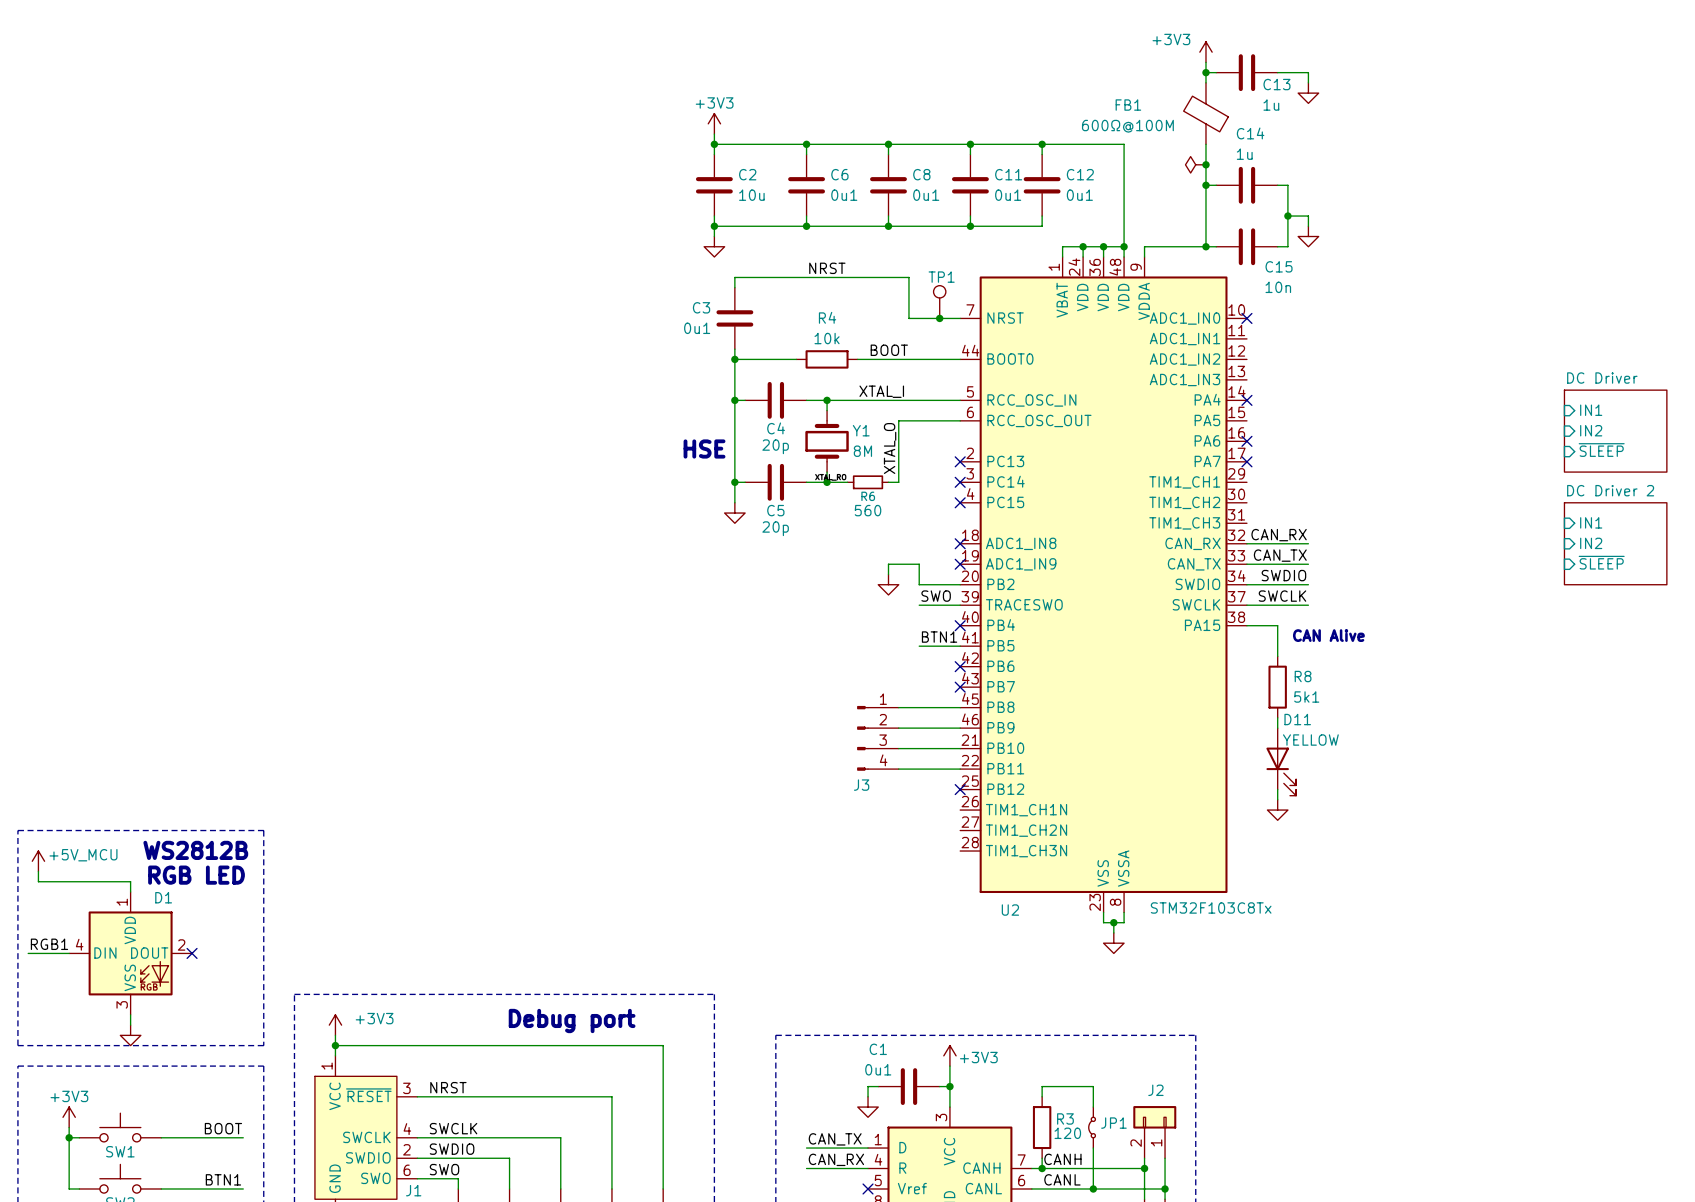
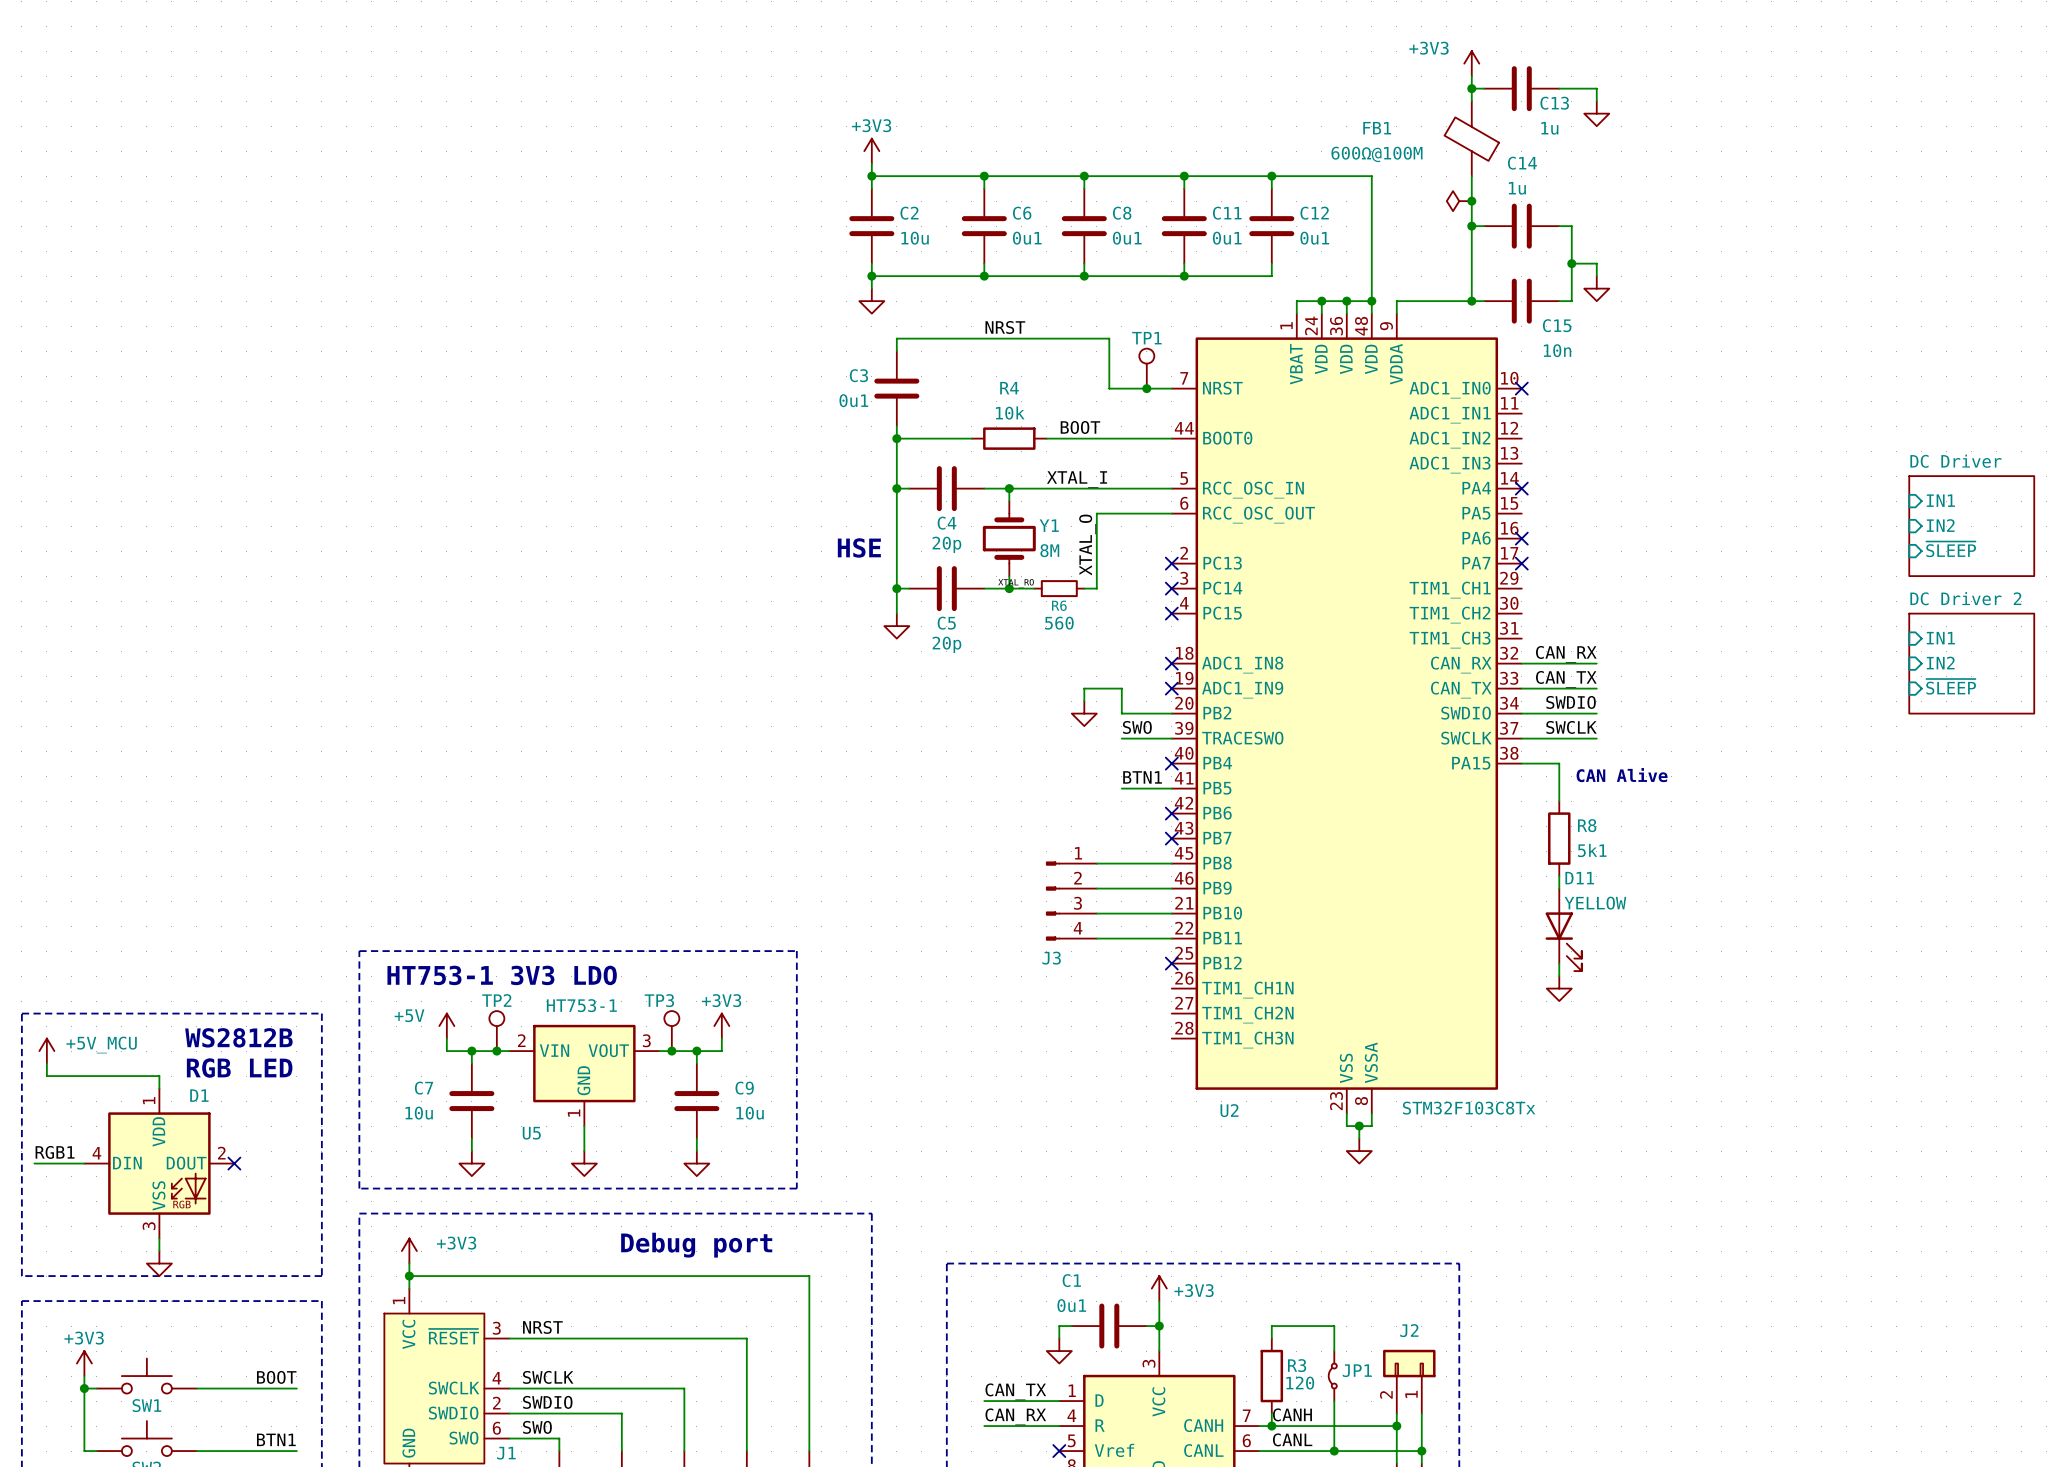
line: none -> (359, 951) (796, 951) (796, 1188) (359, 1188) (359, 951)
text: none -> HT753-1 3V3 LDO (502, 975)
power symbol: none -> +5V (446, 1026)
power symbol: none -> +3V3 (721, 1026)
TP2: none -> (496, 1031)
TP3: none -> (671, 1031)
wire: none -> (446, 1038) (446, 1051) (509, 1051)
wire: none -> (721, 1038) (721, 1051) (659, 1051)
wire: none -> (471, 1051) (471, 1063)
junction: none -> (471, 1051)
junction: none -> (496, 1051)
junction: none -> (671, 1051)
wire: none -> (696, 1051) (696, 1063)
junction: none -> (696, 1051)
U5: none -> HT753-1 (584, 1075)
C7: none -> 10u (471, 1101)
C9: none -> 10u (696, 1101)
wire: none -> (584, 1126) (584, 1151)
wire: none -> (471, 1138) (471, 1151)
wire: none -> (696, 1138) (696, 1151)
power symbol: none -> (471, 1163)
power symbol: none -> (584, 1163)
power symbol: none -> (696, 1163)

